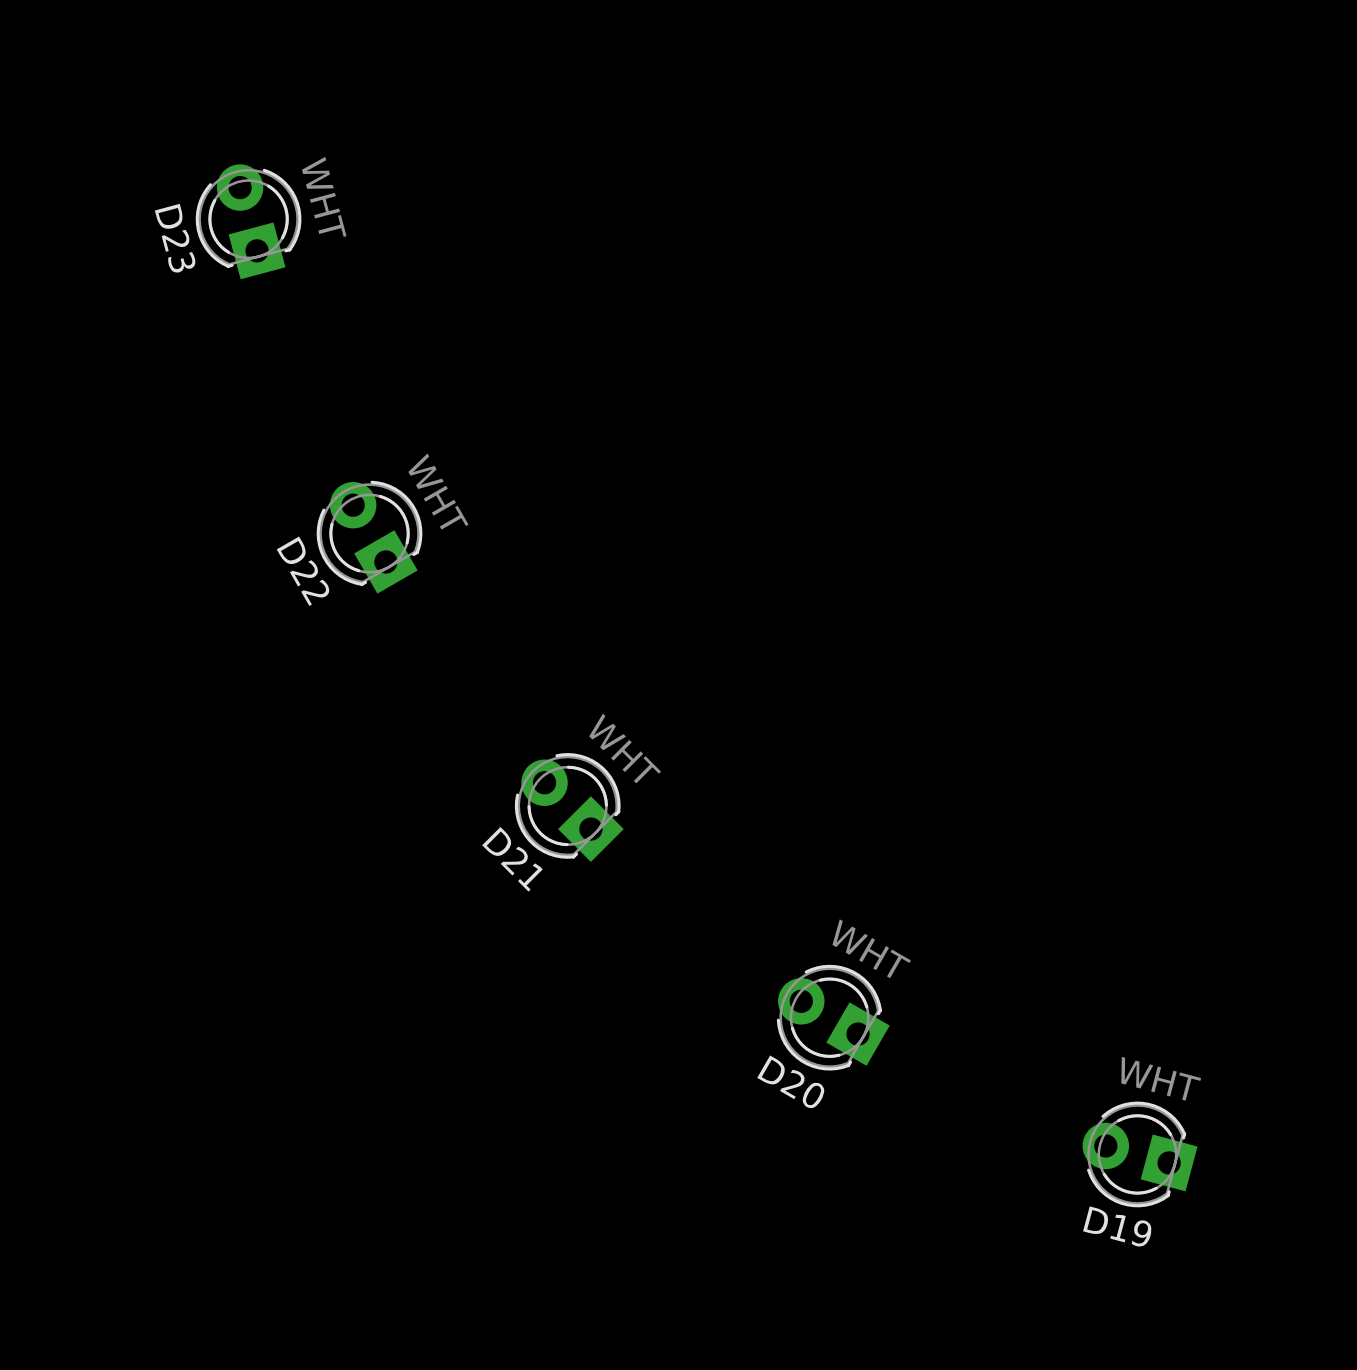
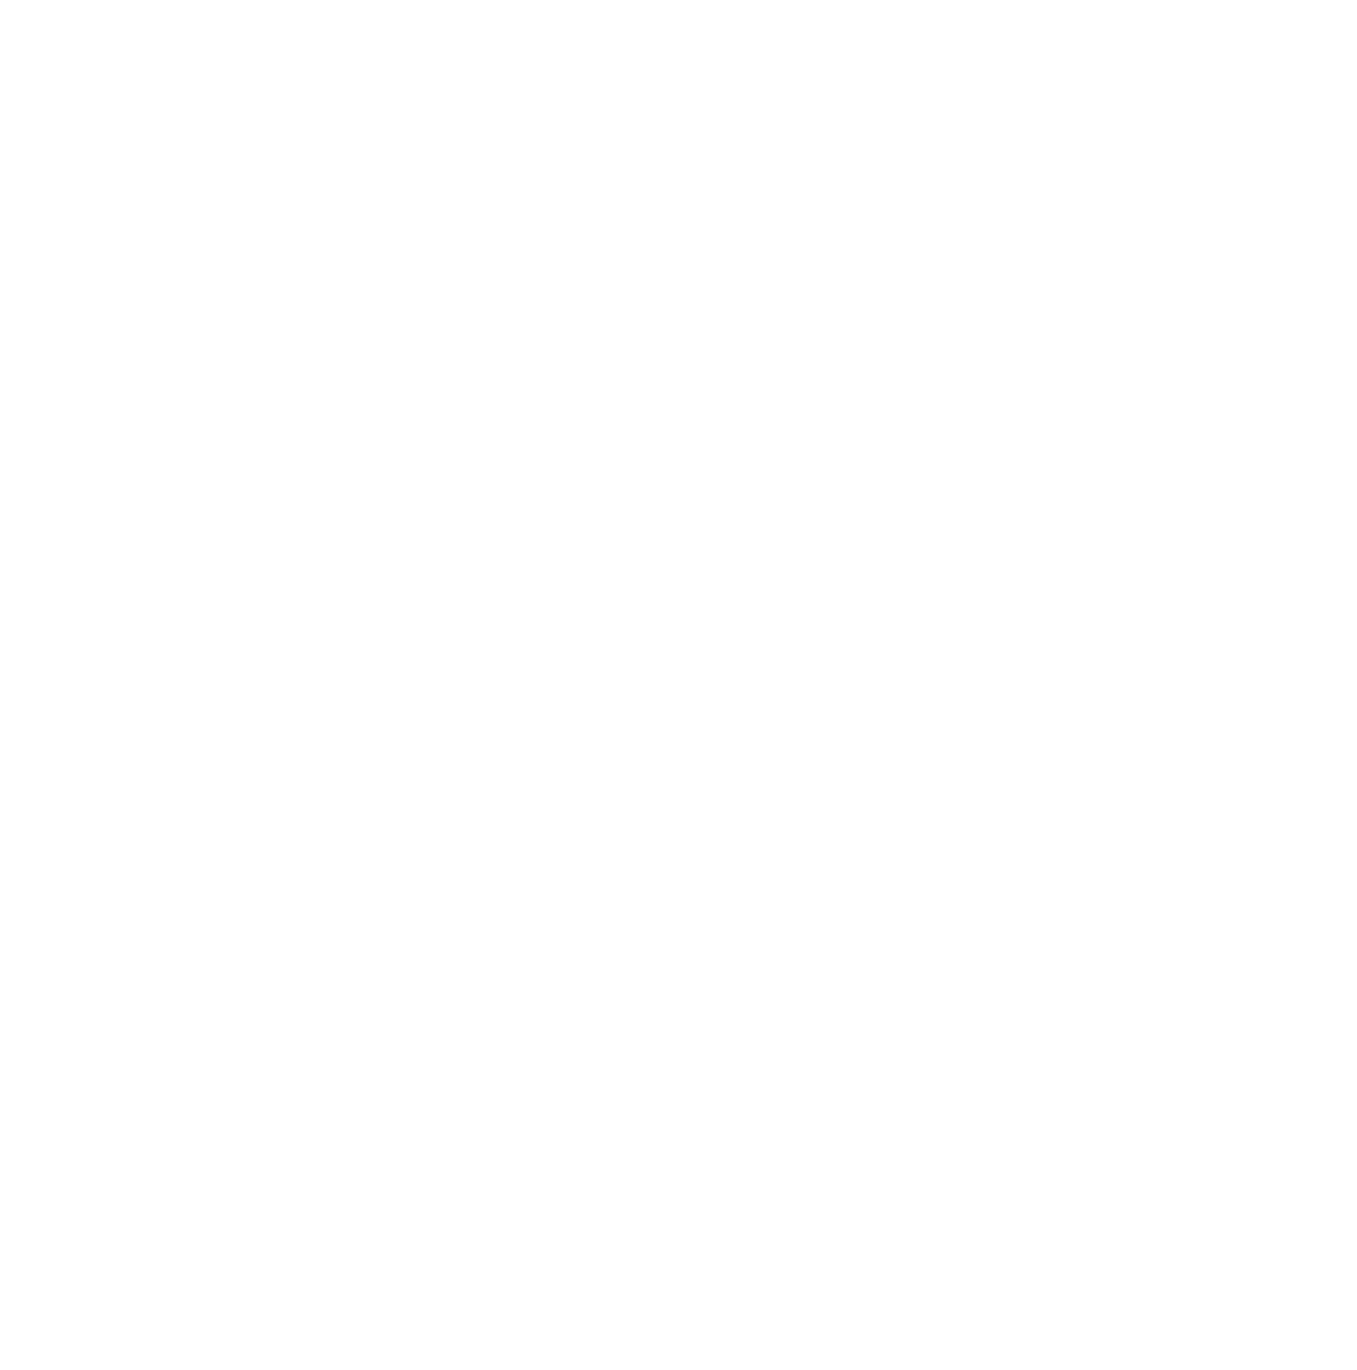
D23: WHT (248, 221) -> none
D22: WHT (369, 537) -> none
D21: WHT (569, 807) -> none
D20: WHT (833, 1017) -> none
D19: WHT (1140, 1154) -> none

